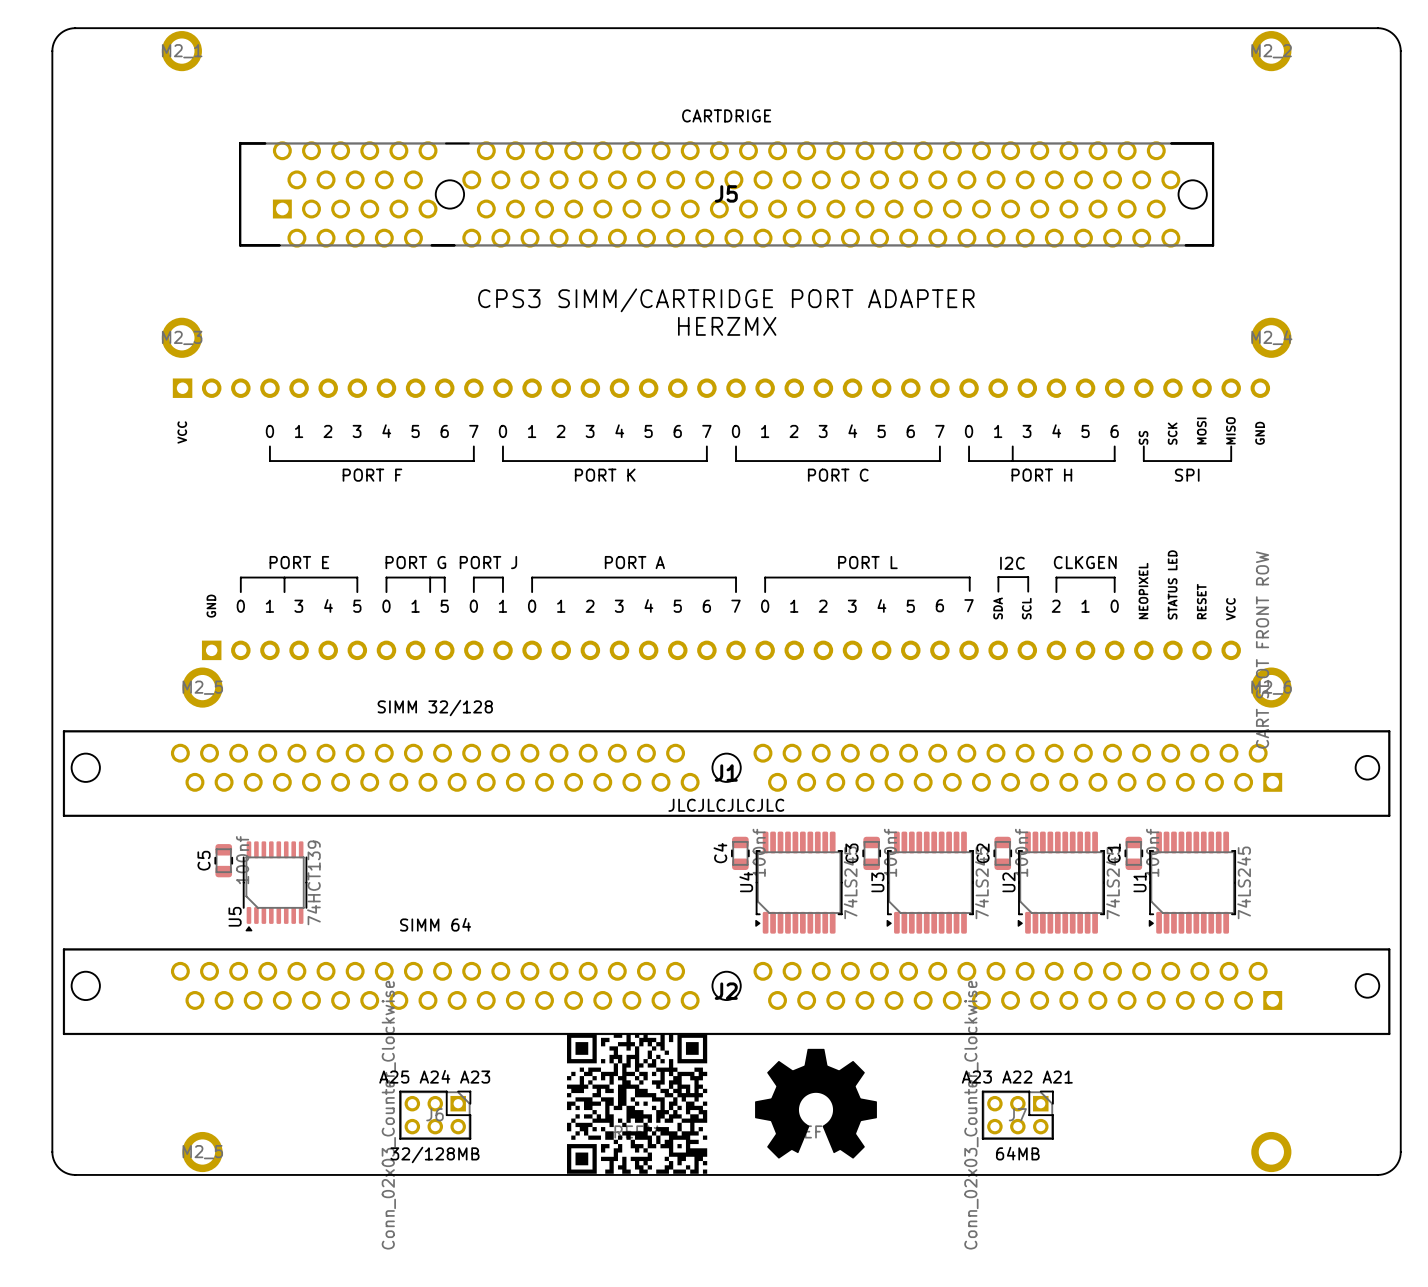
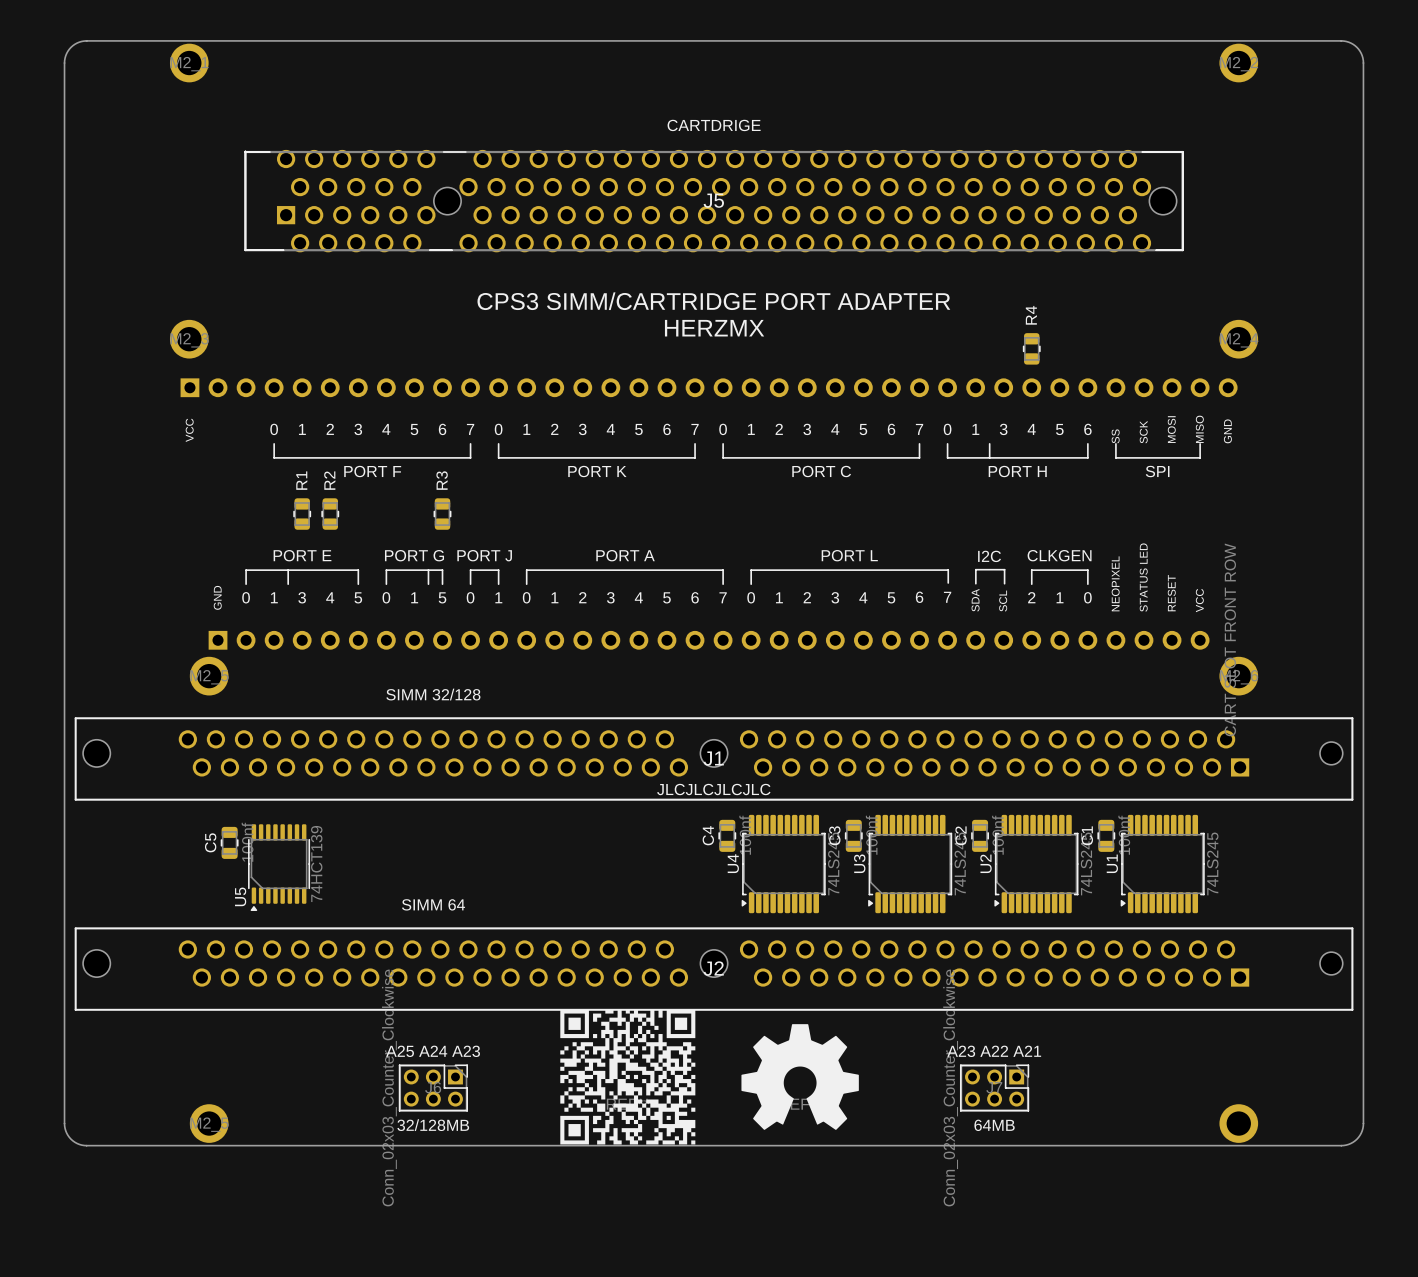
R4: none -> (1031, 348)
R1: none -> (302, 514)
R2: none -> (330, 514)
R3: none -> (442, 514)

